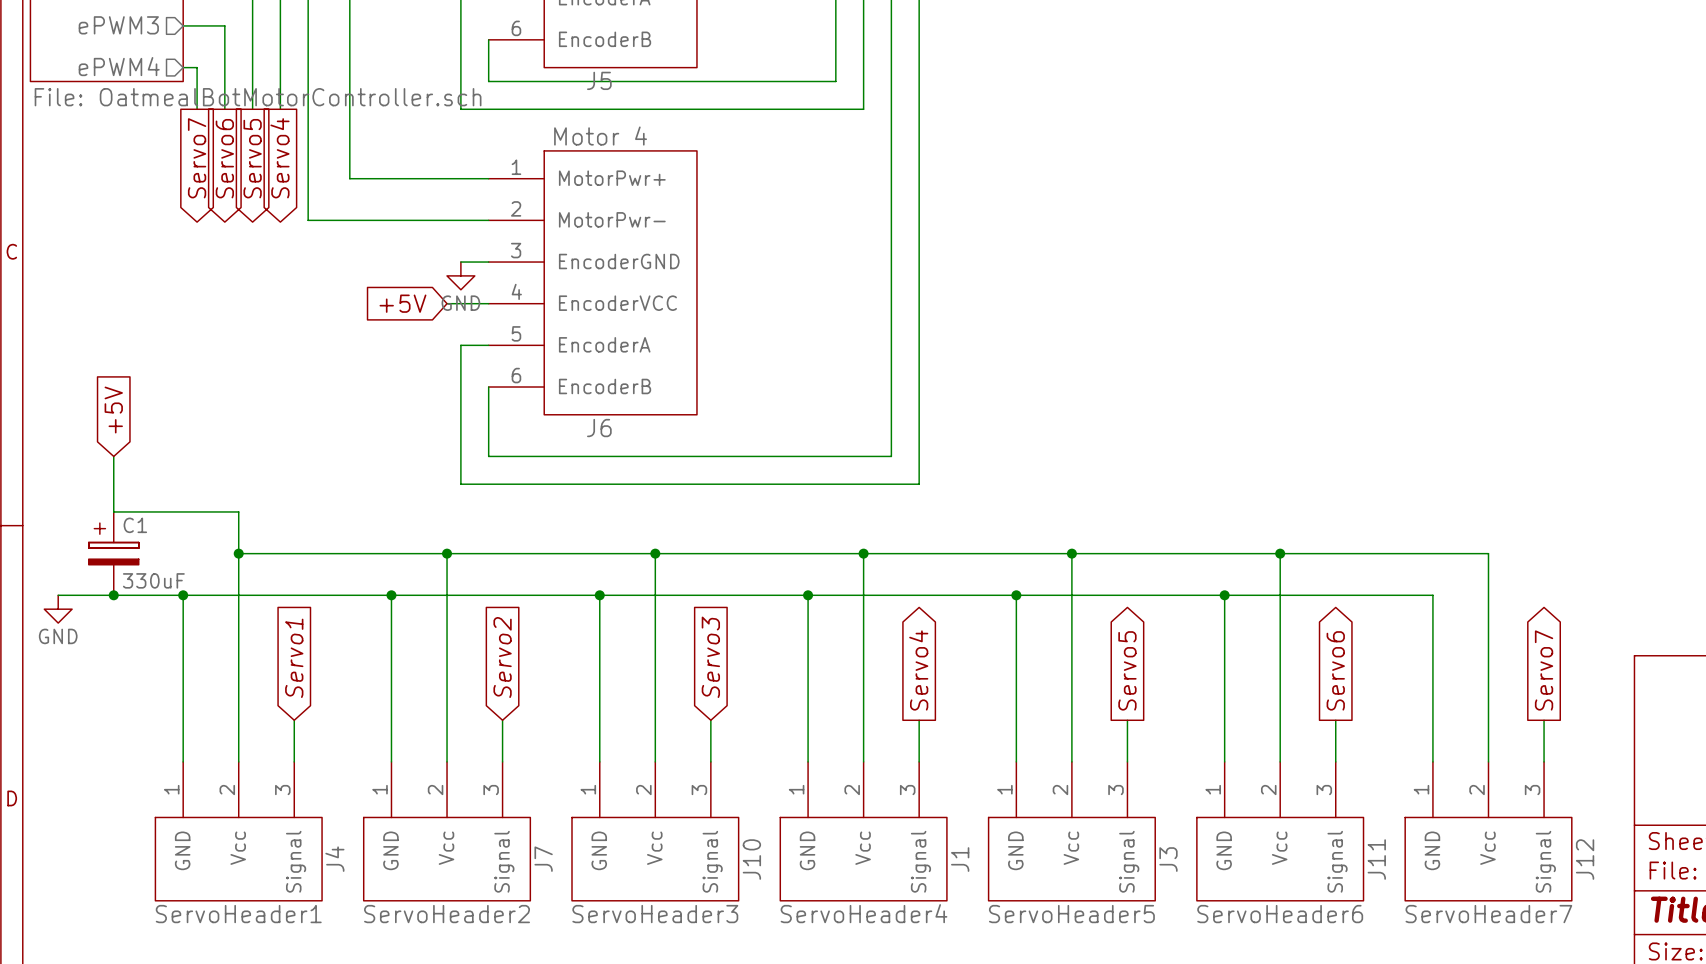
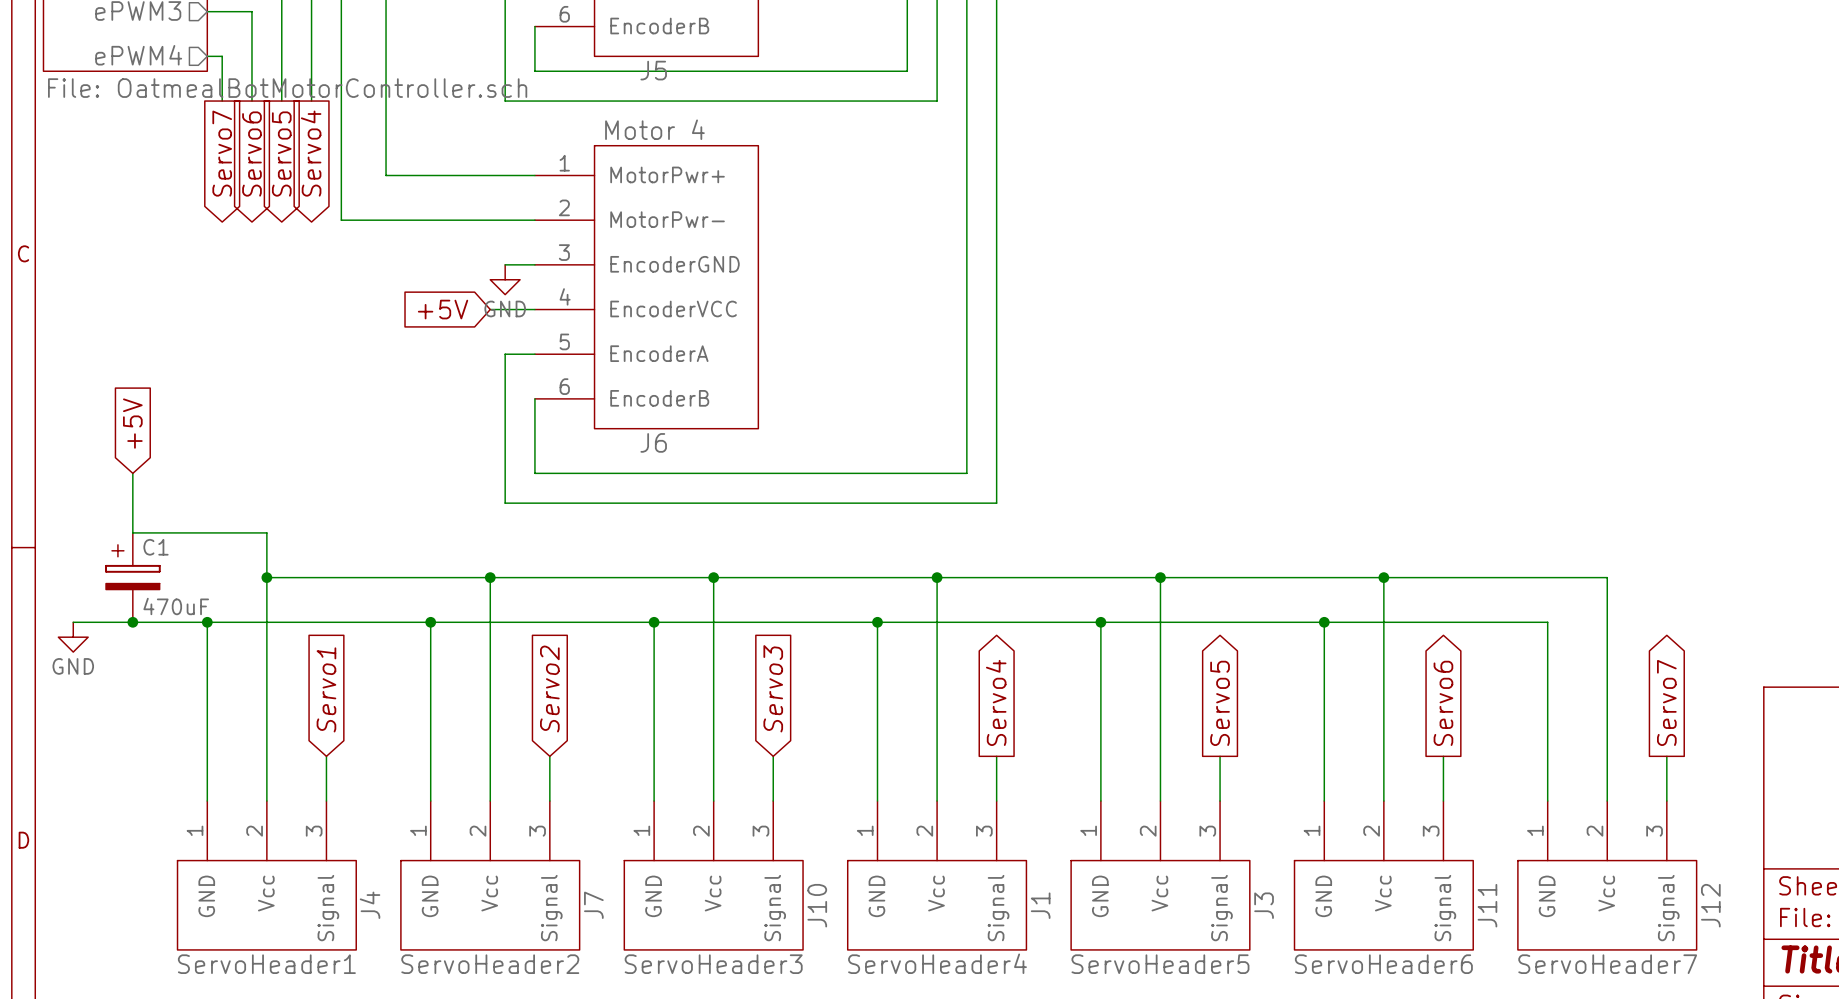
C1 value: 330uF (153, 580) -> 470uF (176, 606)

